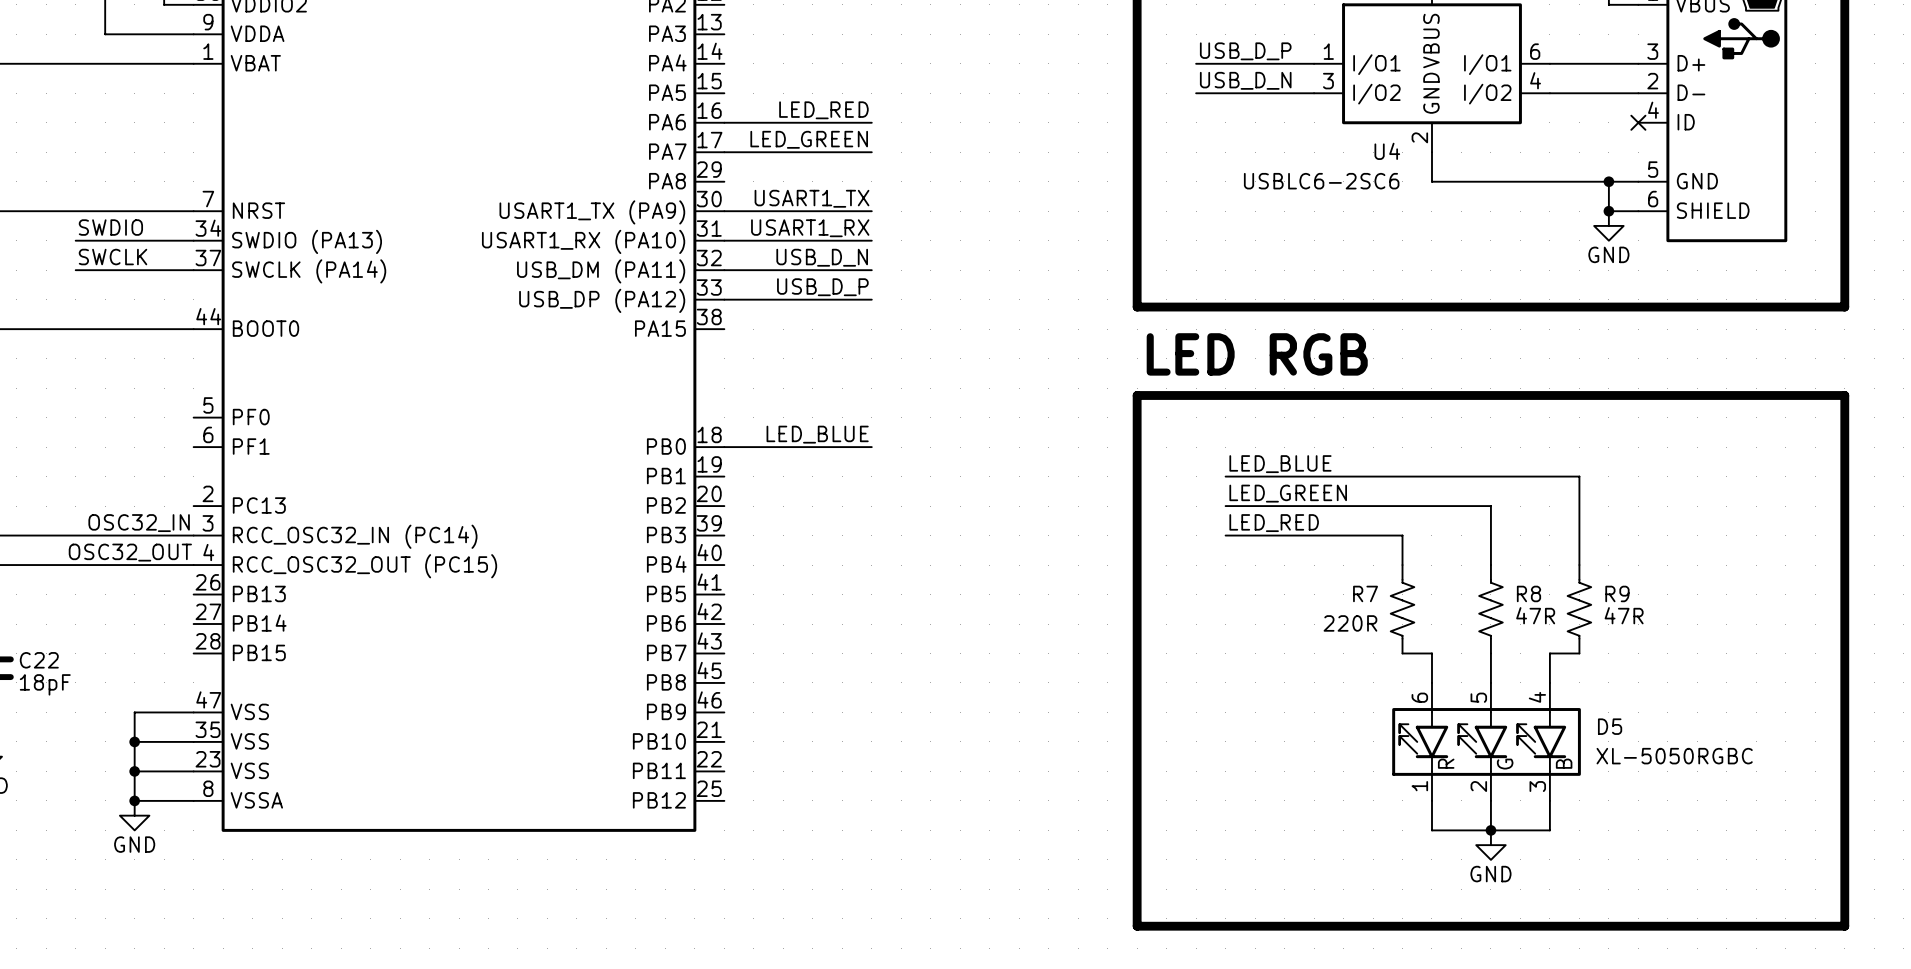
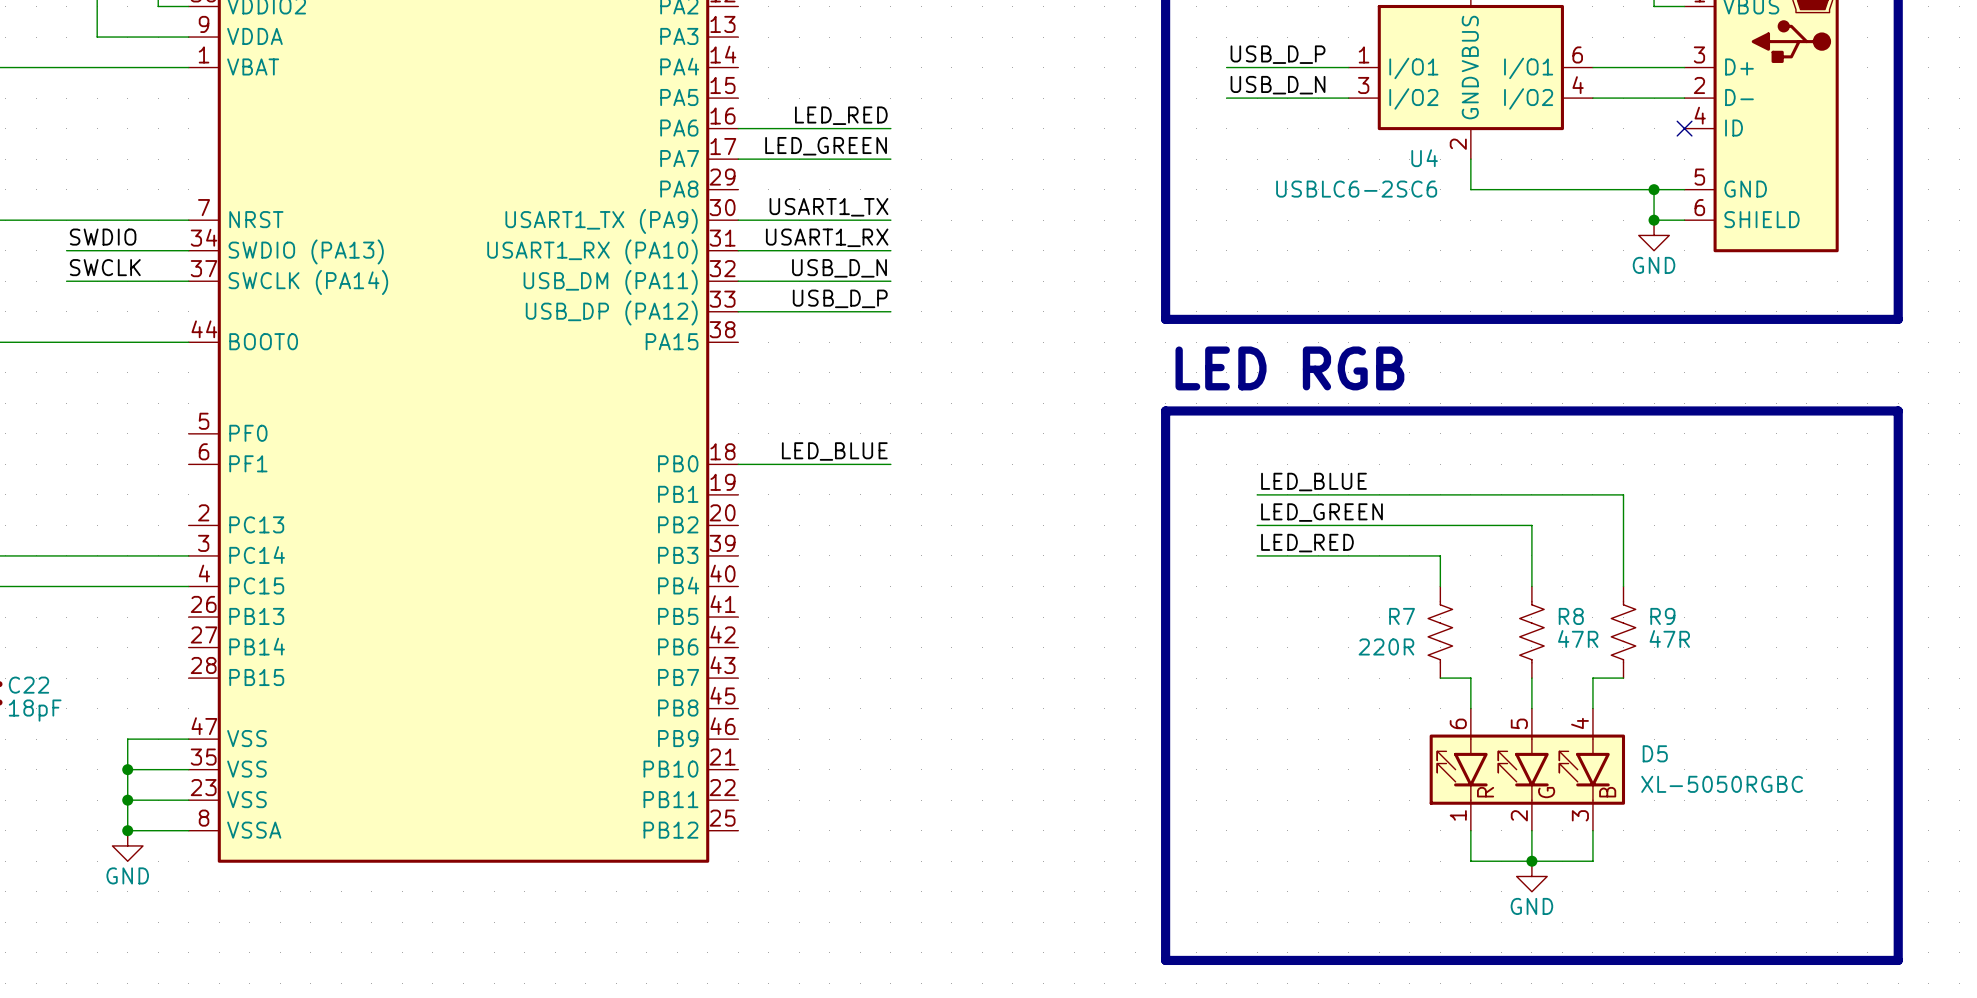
label: OSC32_IN (139, 523) -> none
part pin name: RCC_OSC32_IN (PC14) (355, 536) -> PC14 (257, 555)
label: OSC32_OUT (130, 552) -> none
part pin name: RCC_OSC32_OUT (PC15) (364, 566) -> PC15 (256, 585)

